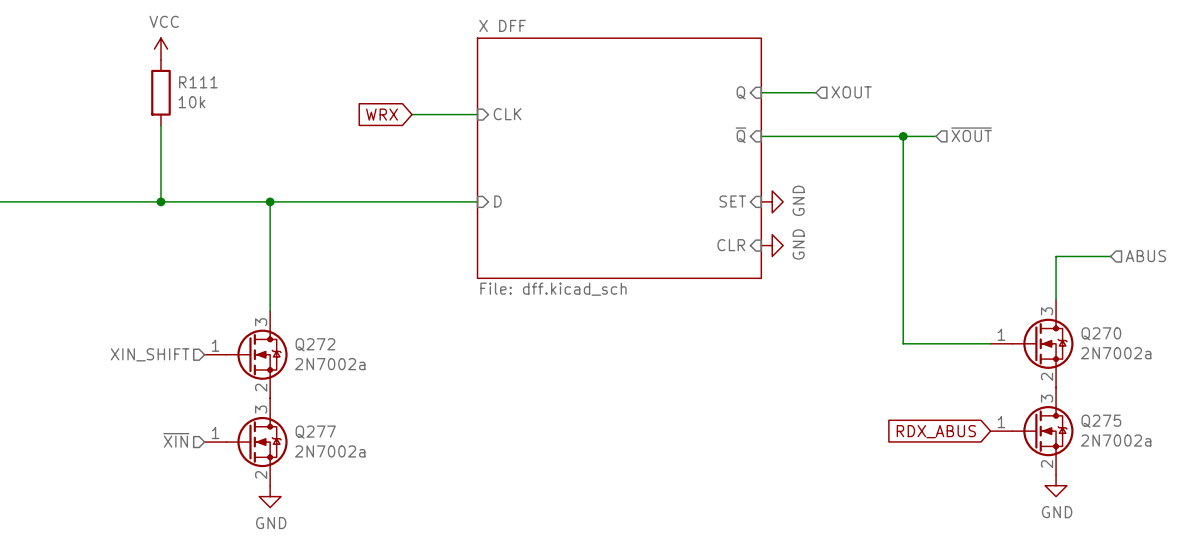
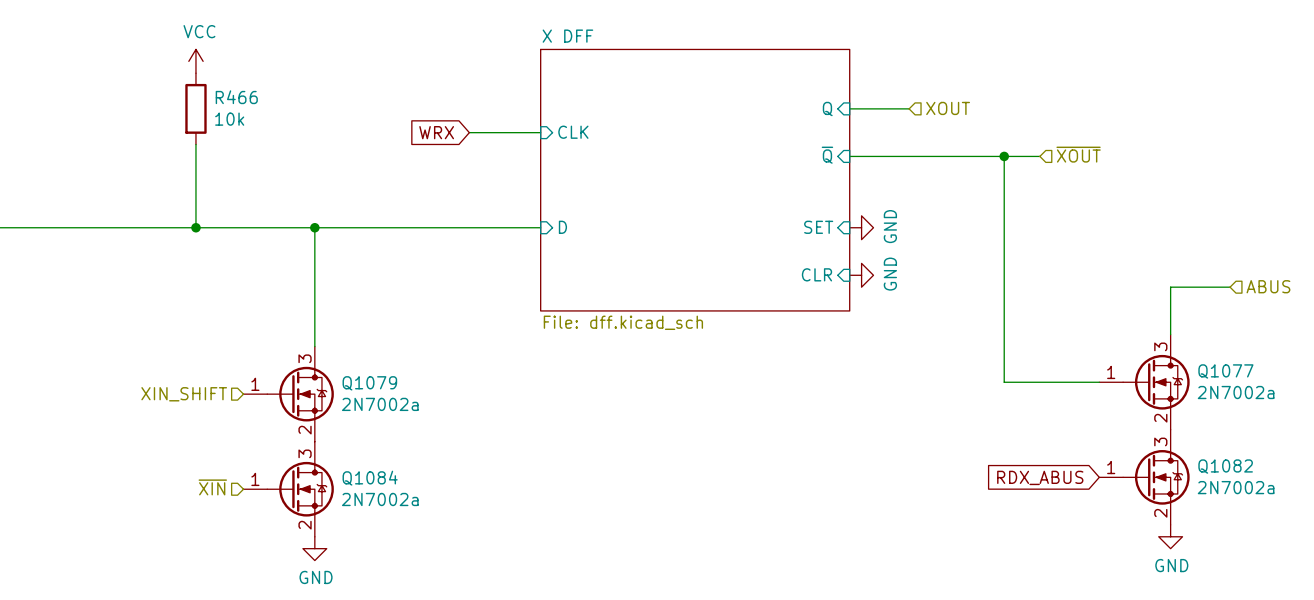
R111 name: R111 (198, 82) -> R466 (236, 97)
Q270 name: Q270 (1101, 333) -> Q1077 (1225, 371)
Q272 name: Q272 (315, 344) -> Q1079 (369, 383)
Q275 name: Q275 (1101, 421) -> Q1082 (1225, 466)
Q277 name: Q277 (315, 432) -> Q1084 (370, 478)

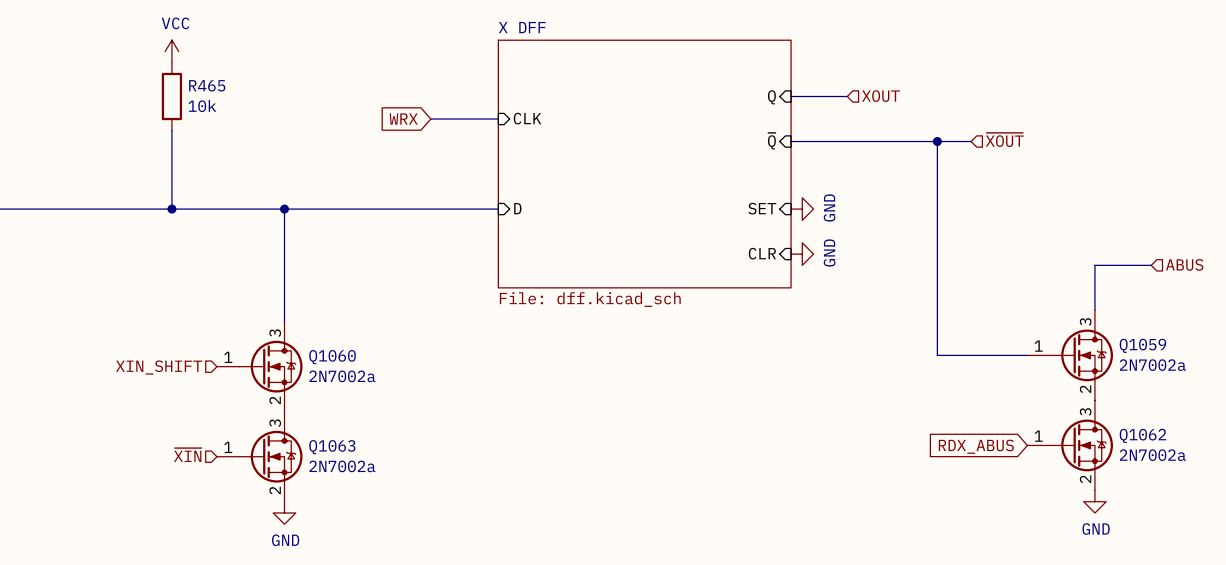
R466 name: R466 (236, 97) -> R465 (207, 85)
Q1077 name: Q1077 (1225, 371) -> Q1059 (1142, 345)
Q1079 name: Q1079 (369, 383) -> Q1060 (332, 357)
Q1082 name: Q1082 (1225, 466) -> Q1062 (1142, 435)
Q1084 name: Q1084 (370, 478) -> Q1063 (332, 447)

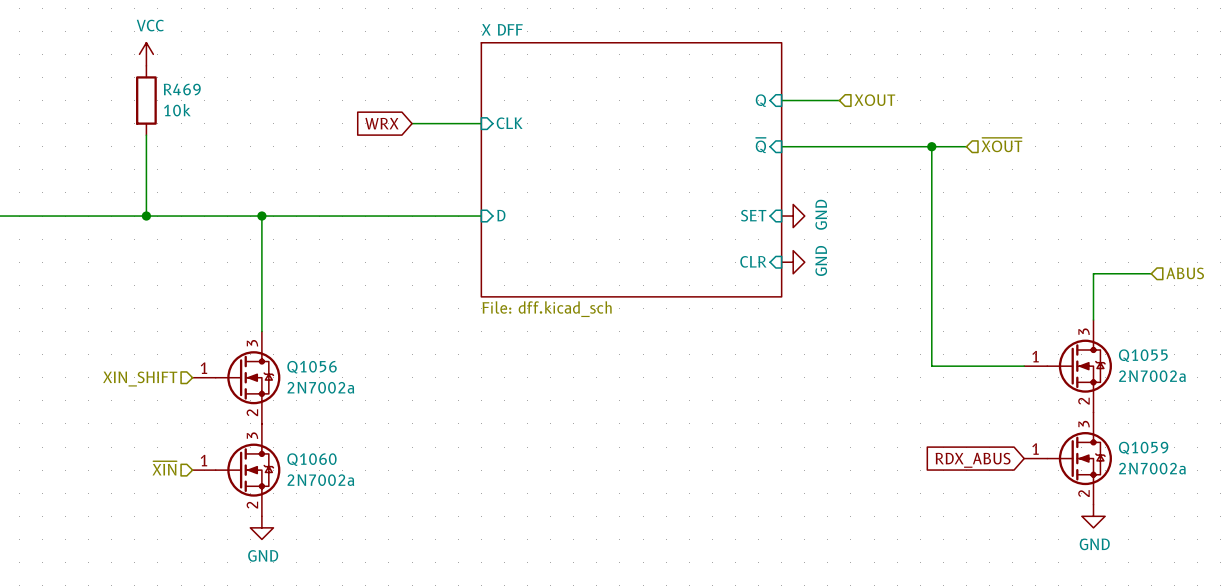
R465 name: R465 (207, 85) -> R469 (182, 89)
Q1059 name: Q1059 (1142, 345) -> Q1055 (1143, 355)
Q1060 name: Q1060 (332, 357) -> Q1056 (312, 367)
Q1062 name: Q1062 (1142, 435) -> Q1059 (1143, 448)
Q1063 name: Q1063 (332, 447) -> Q1060 (311, 459)

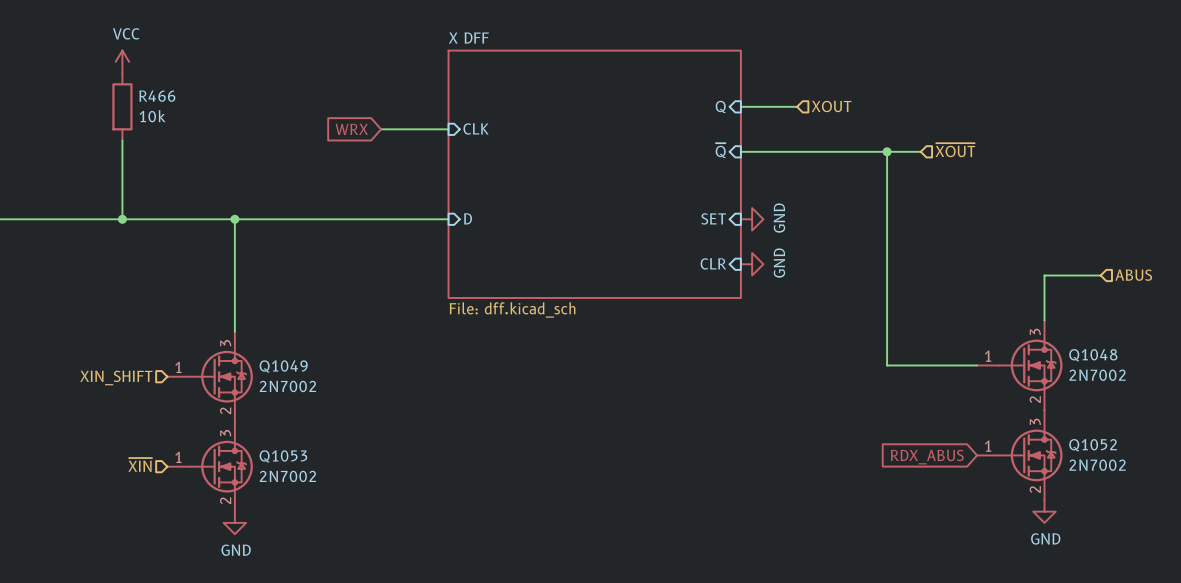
R469 name: R469 (182, 89) -> R466 (157, 96)
Q1055 name: Q1055 (1143, 355) -> Q1048 (1093, 355)
Q1056 name: Q1056 (312, 367) -> Q1049 (283, 366)
Q1055 value: 2N7002a (1152, 376) -> 2N7002 (1097, 375)
Q1056 value: 2N7002a (320, 387) -> 2N7002 (287, 386)
Q1059 name: Q1059 (1143, 448) -> Q1052 (1093, 445)
Q1060 name: Q1060 (311, 459) -> Q1053 (283, 456)
Q1059 value: 2N7002a (1152, 468) -> 2N7002 (1097, 465)
Q1060 value: 2N7002a (320, 480) -> 2N7002 (287, 476)

